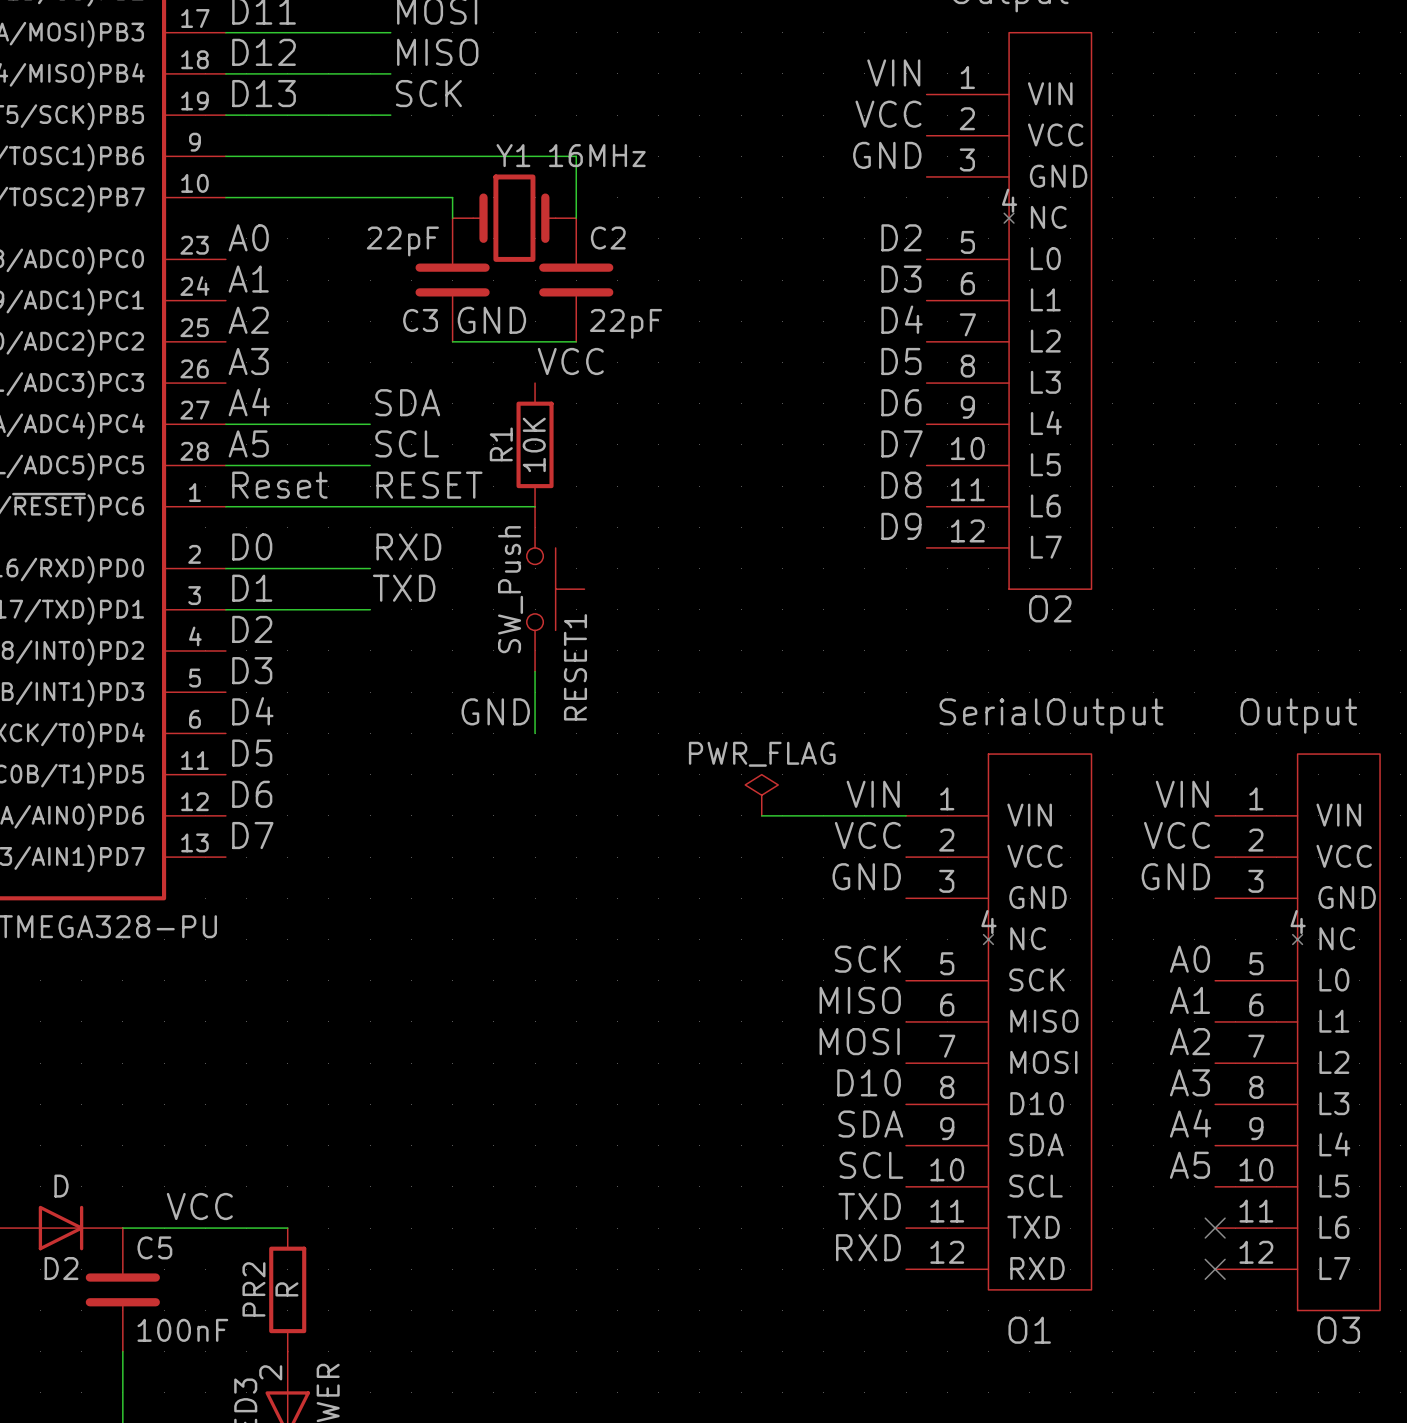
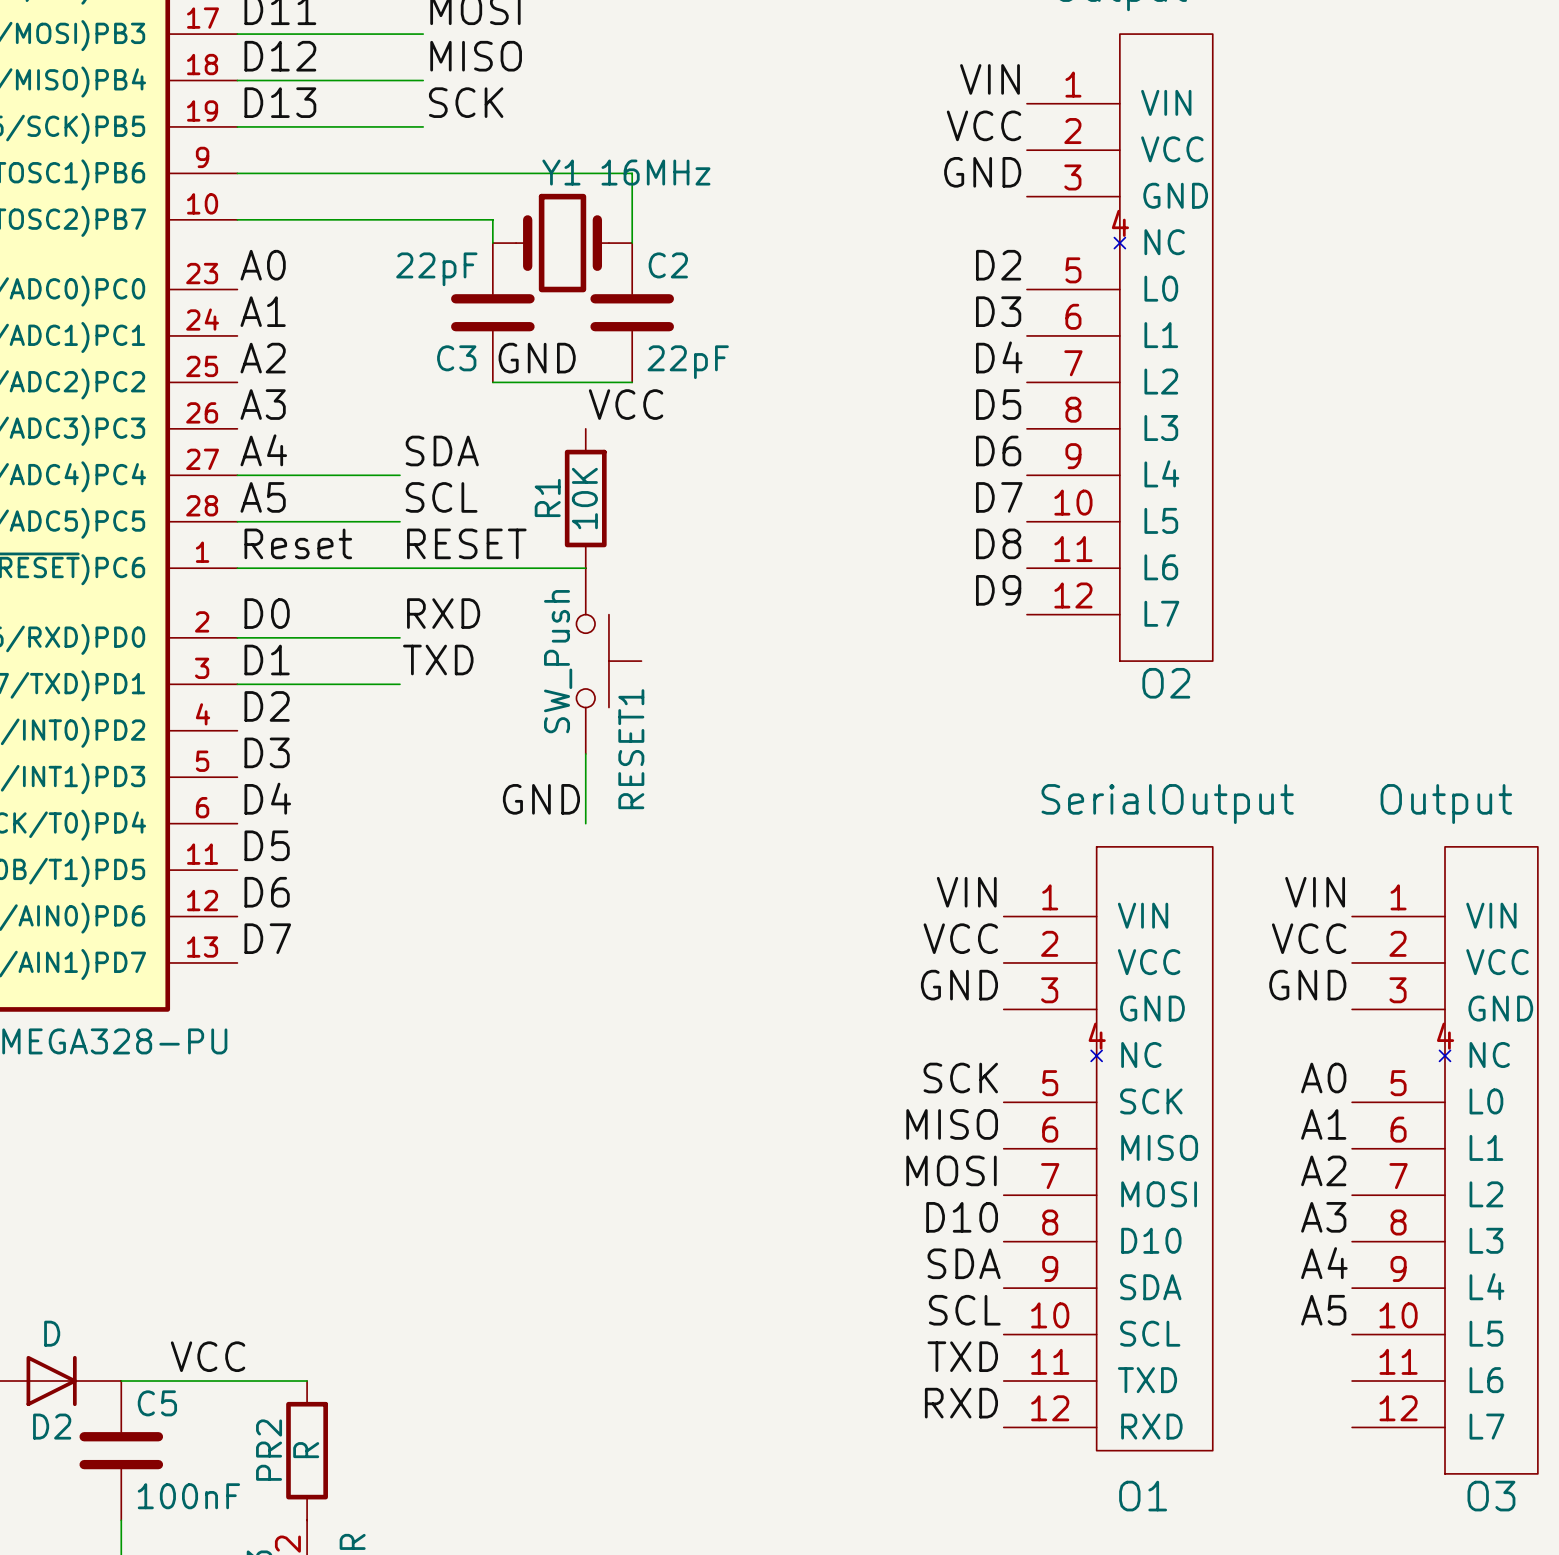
power symbol: PWR_FLAG (761, 795) -> none
wire: (761, 815) (906, 815) -> none
no-connect mark: (1215, 1228) -> none
no-connect mark: (1215, 1269) -> none

